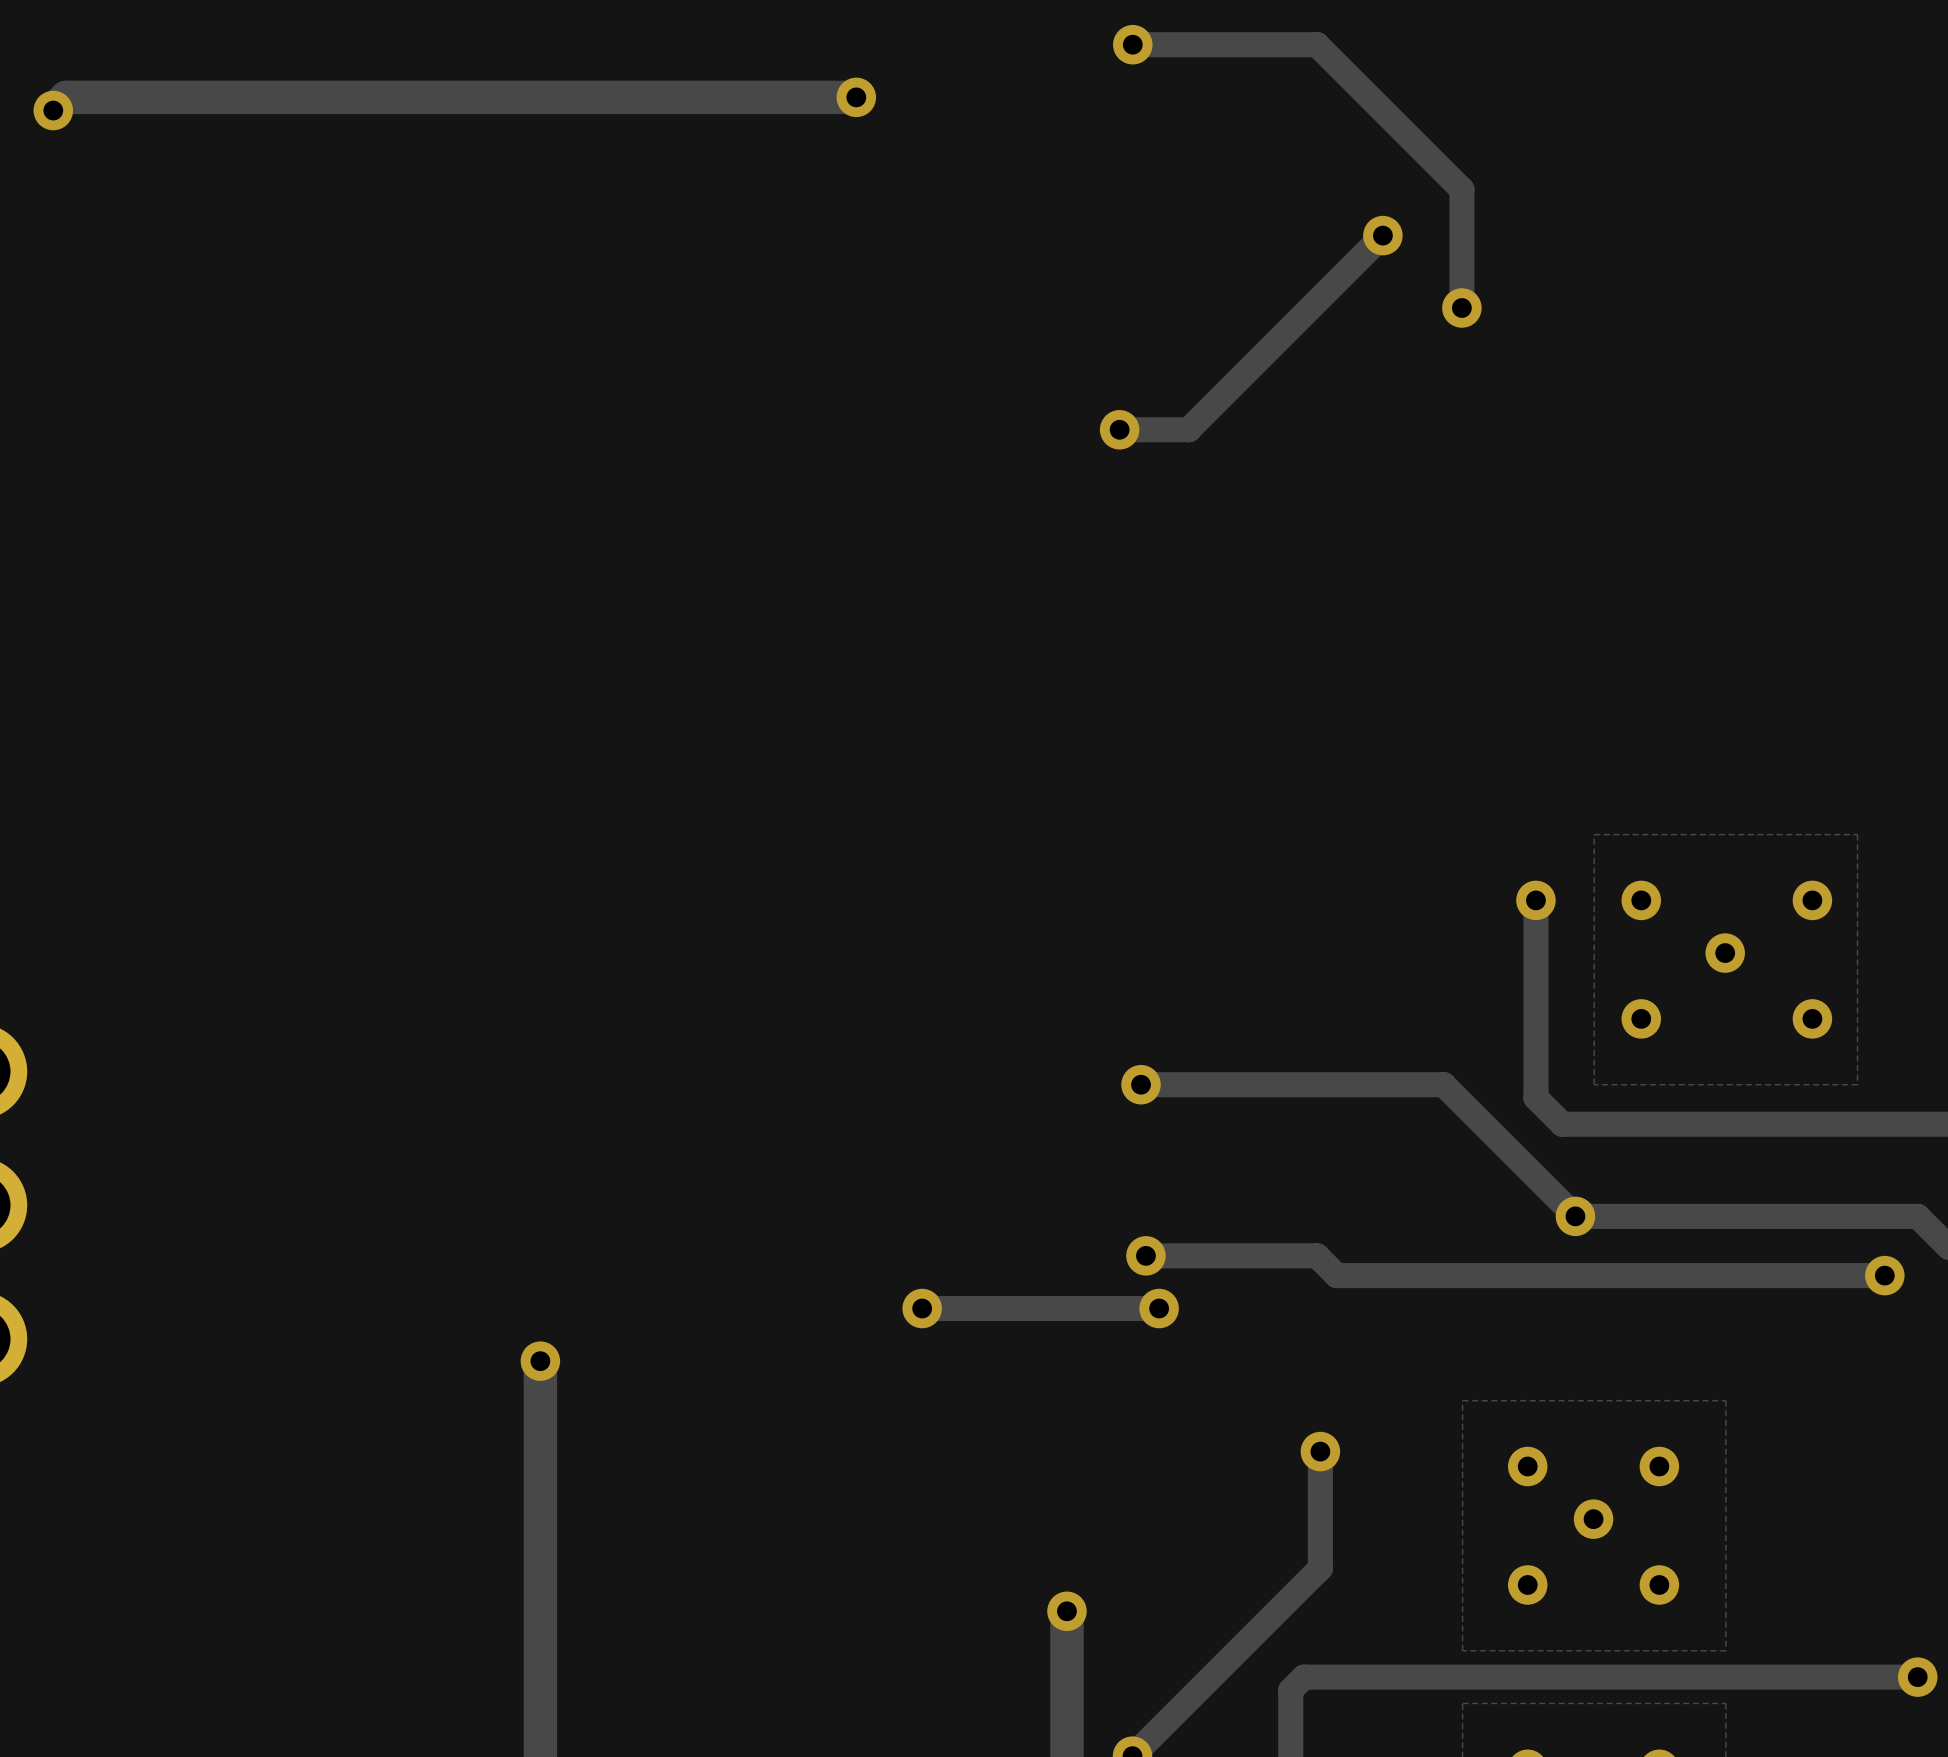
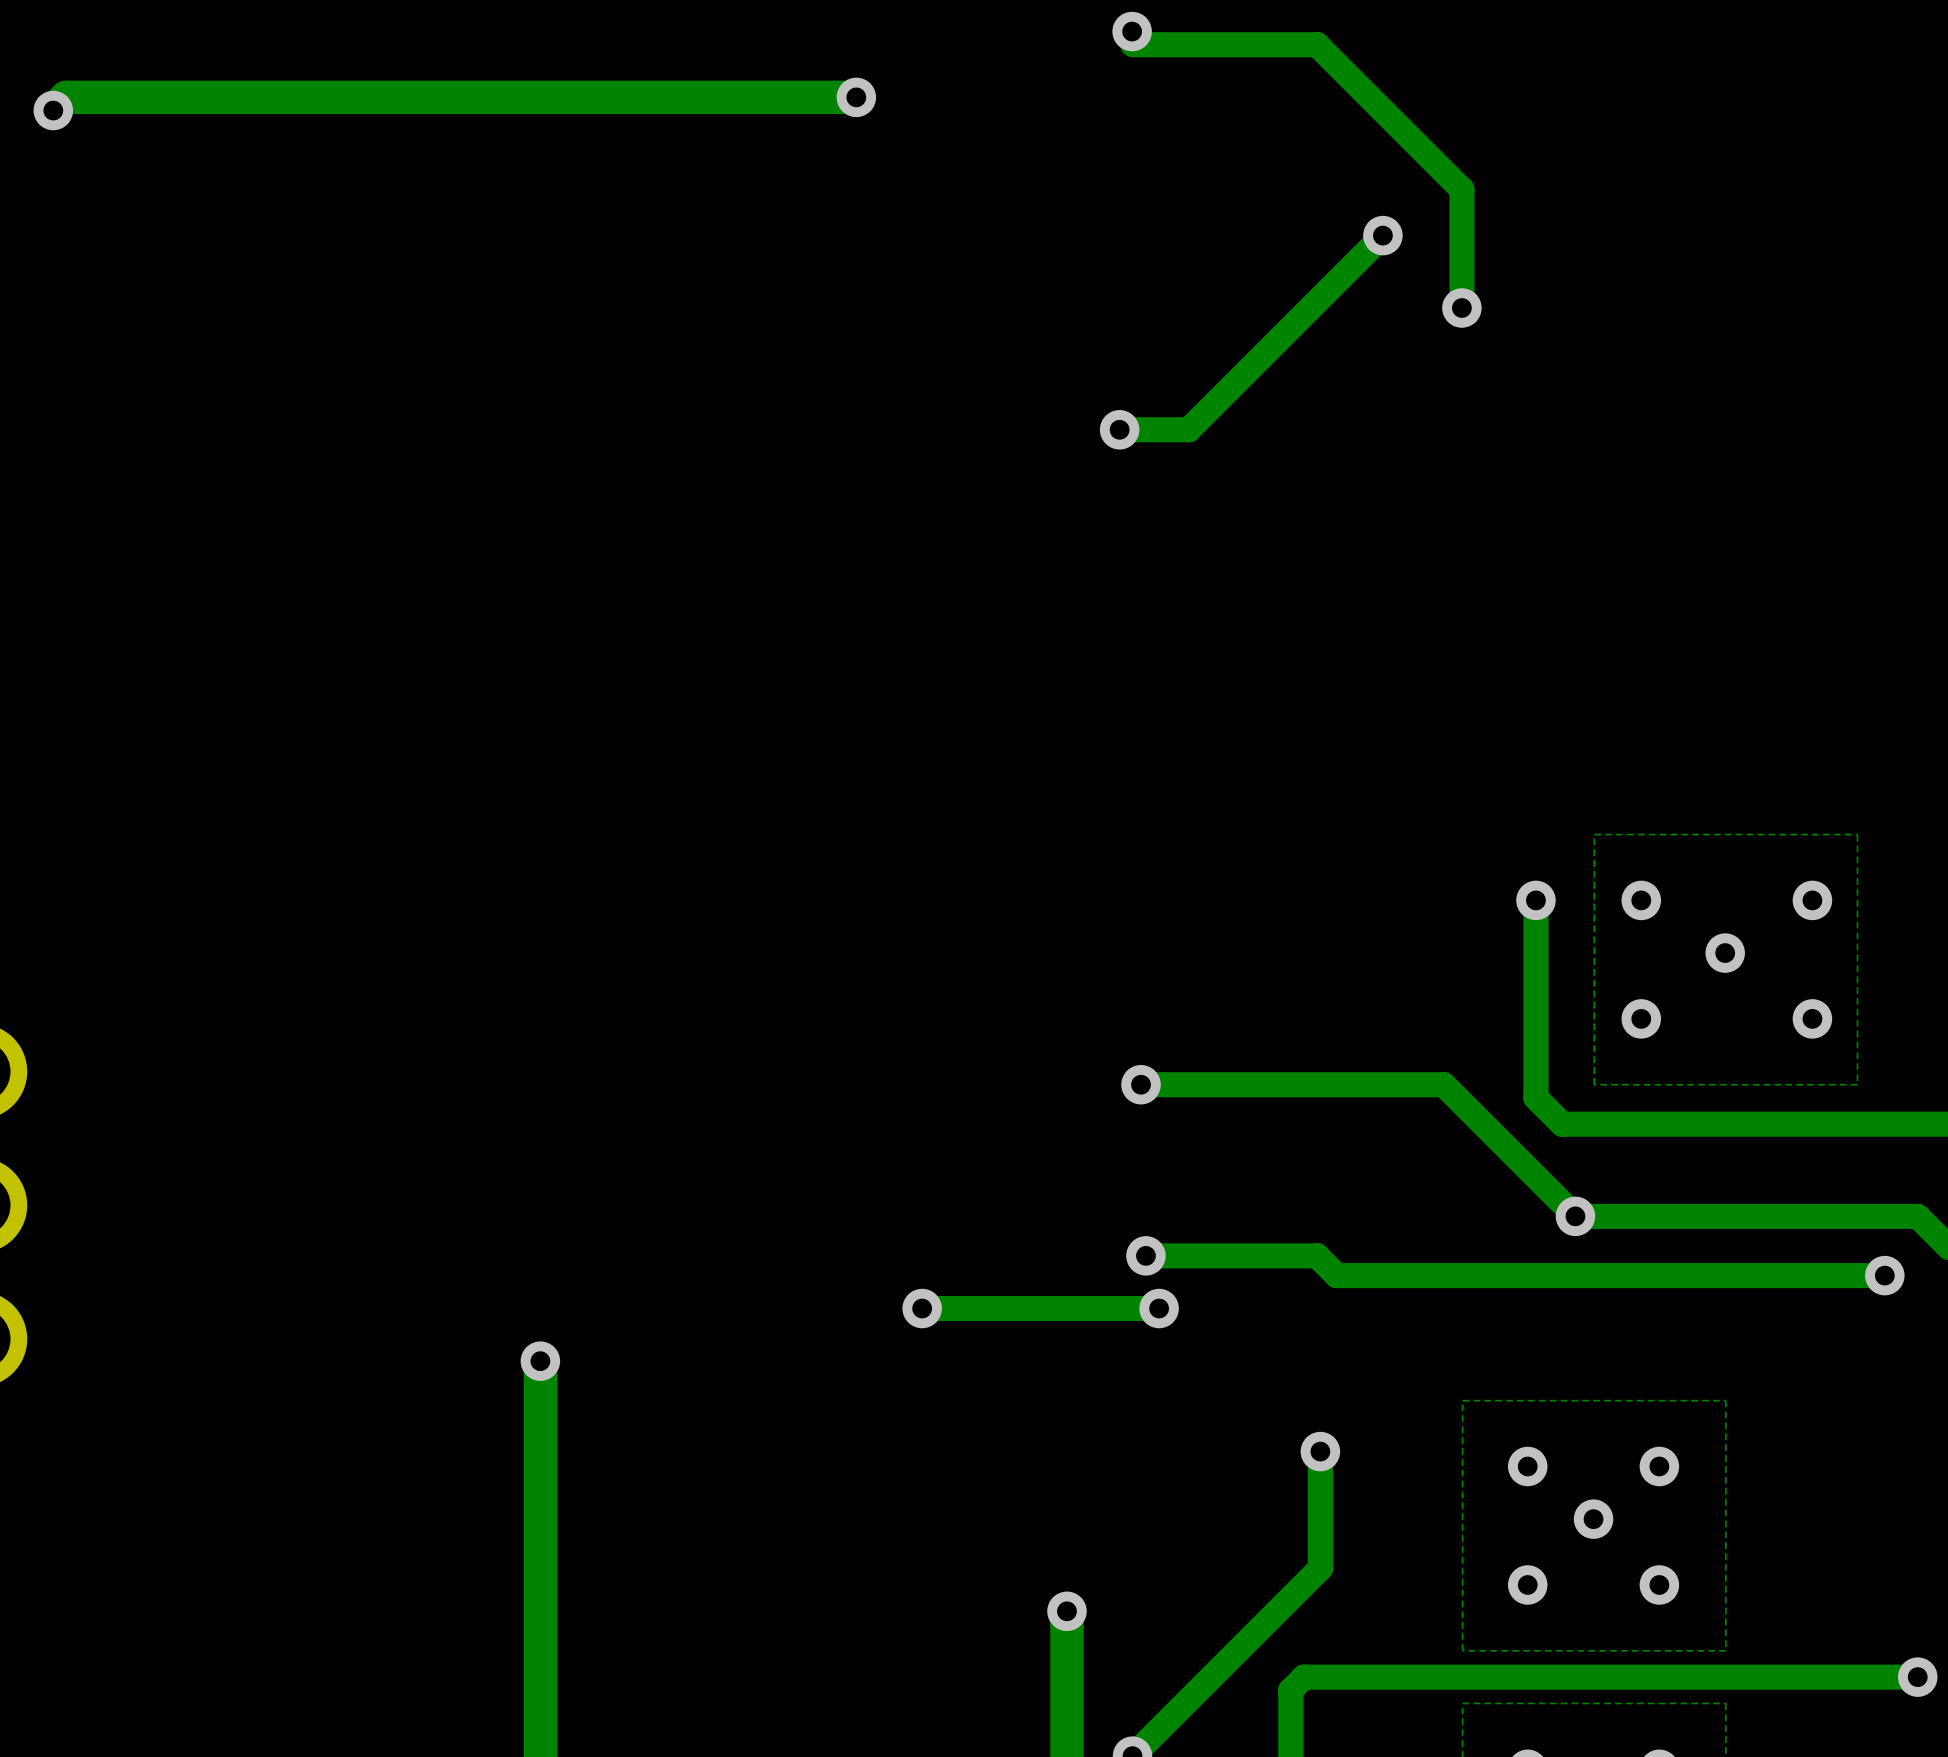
via position: (1132, 44) -> (1132, 31)

